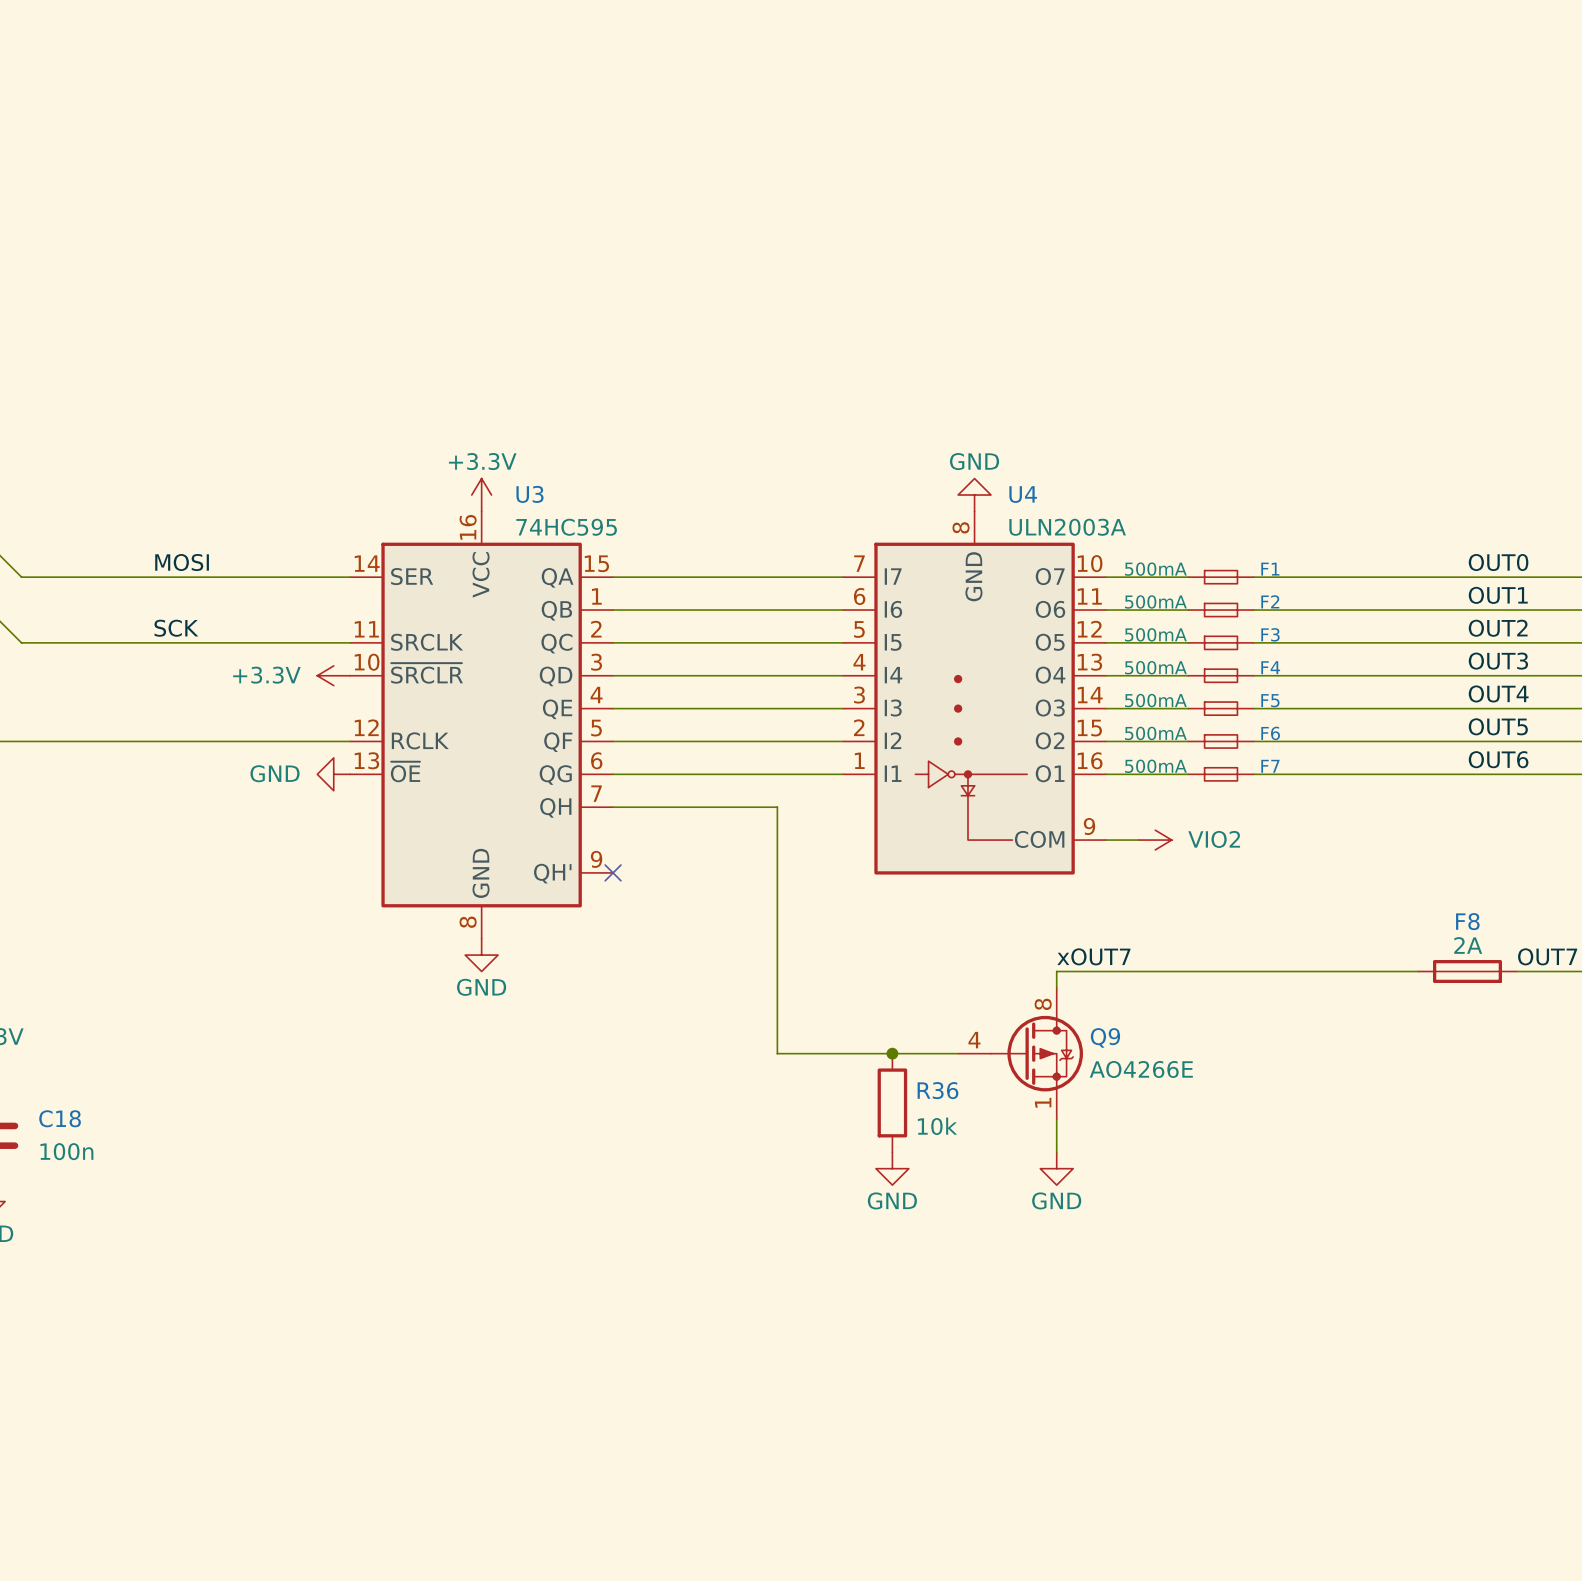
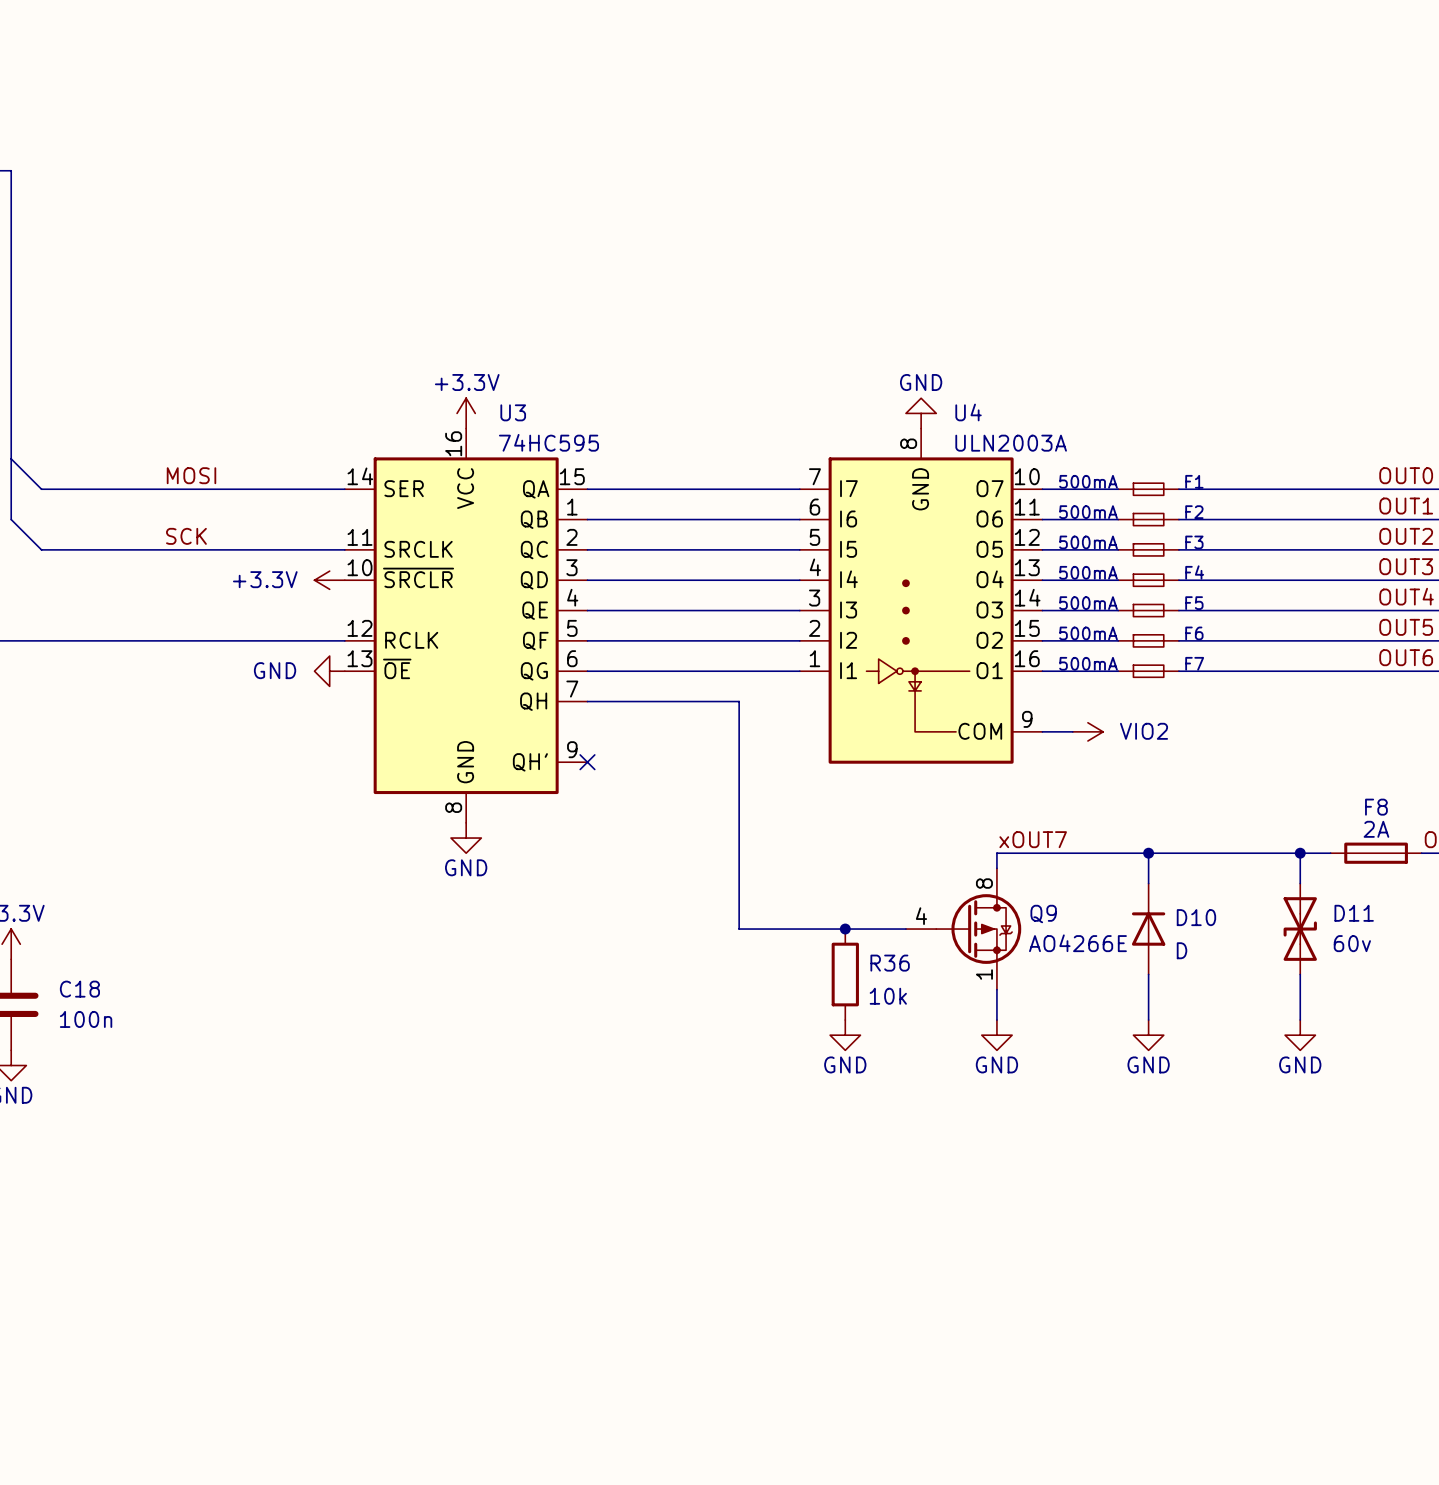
wire: none -> (1148, 853) (1148, 883)
junction: none -> (1148, 853)
wire: none -> (1300, 853) (1300, 883)
junction: none -> (1300, 853)
D10: none -> D (1148, 929)
D11: none -> 60v (1300, 929)
wire: none -> (1148, 974) (1148, 1020)
wire: none -> (1300, 974) (1300, 1020)
power symbol: none -> GND (1148, 1035)
power symbol: none -> GND (1300, 1035)

